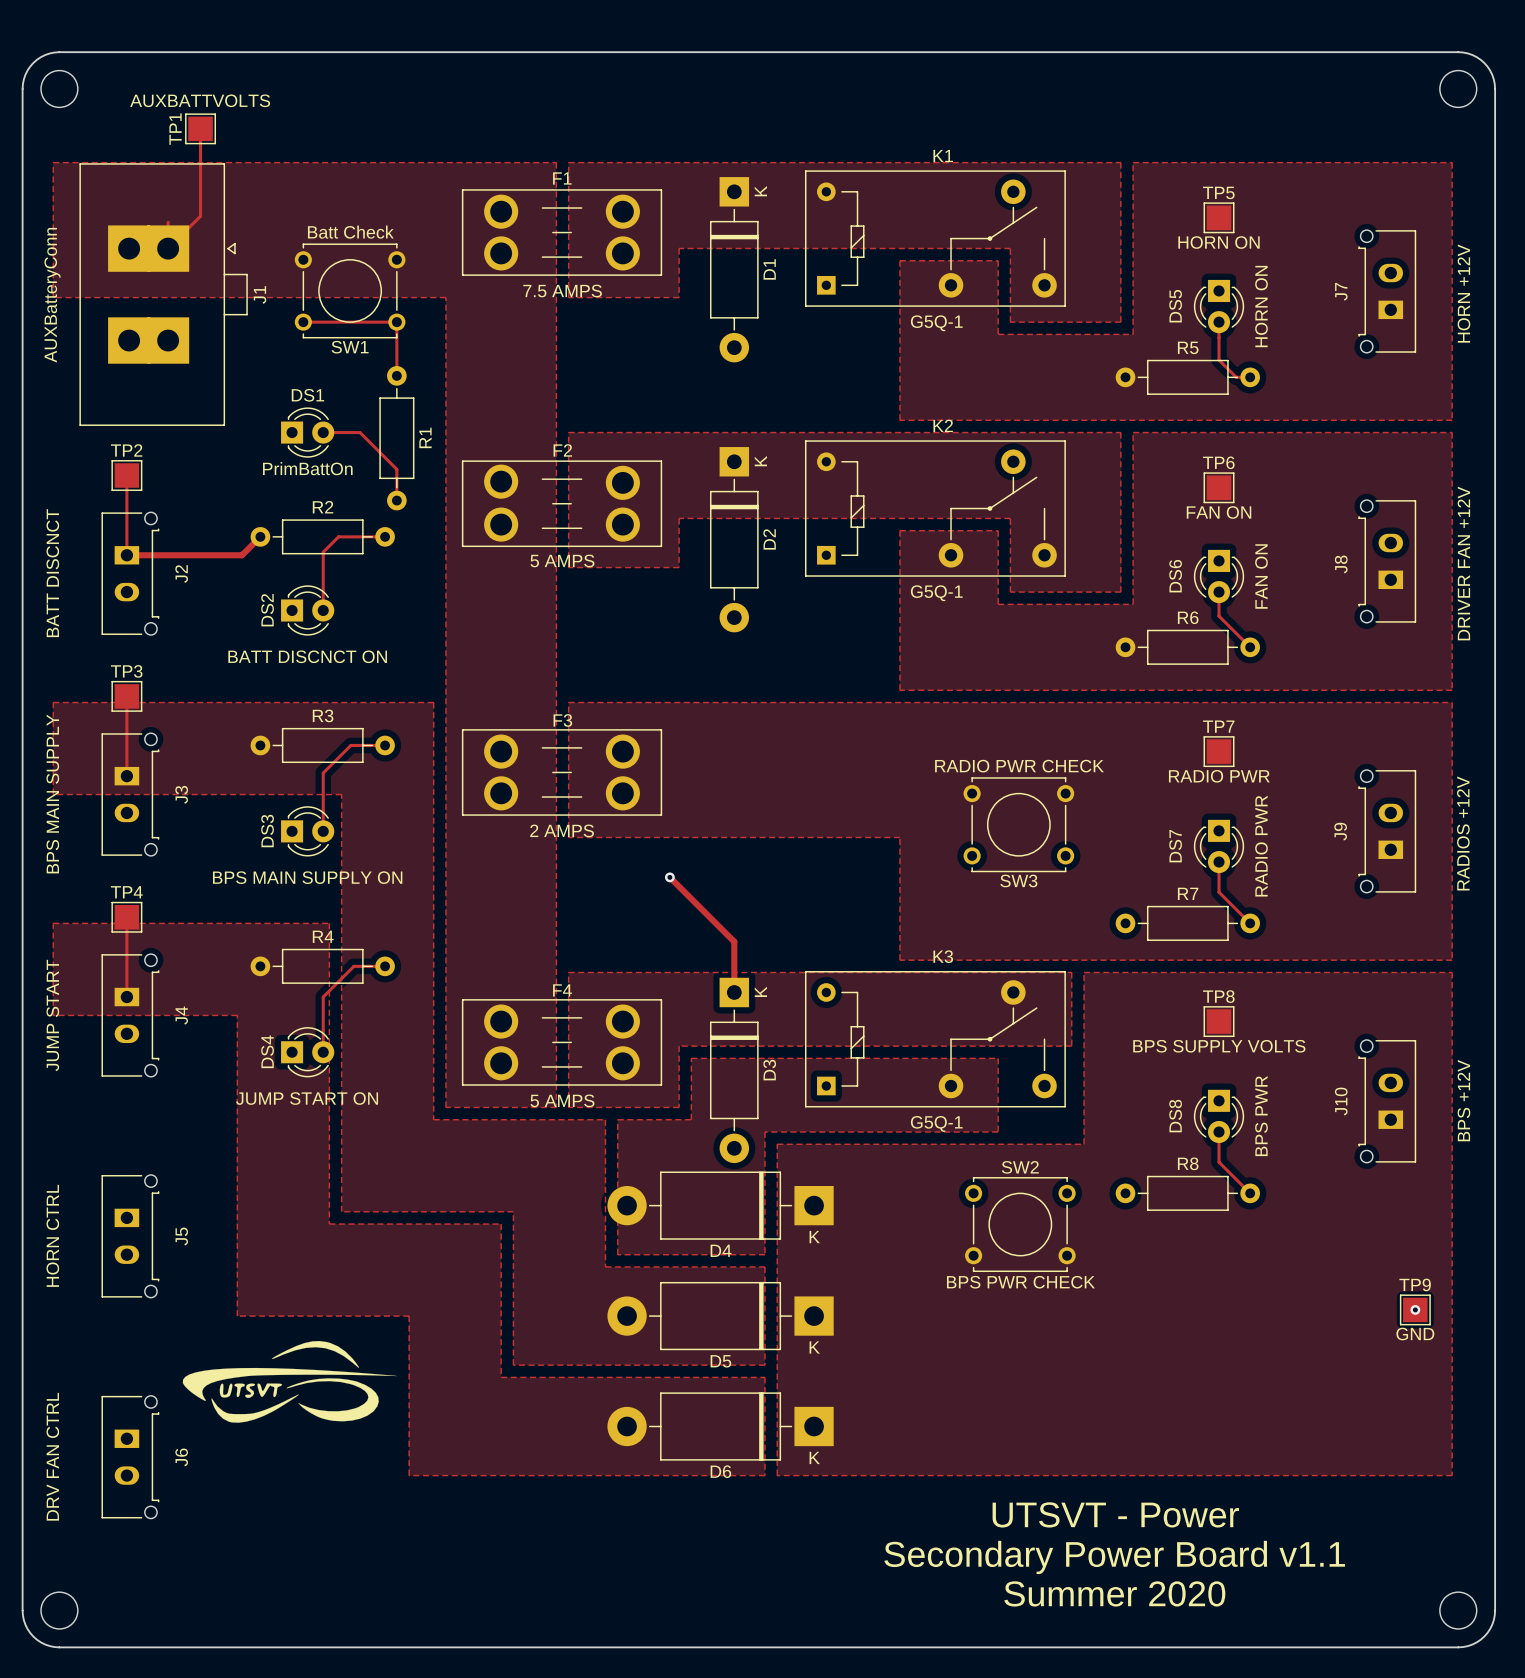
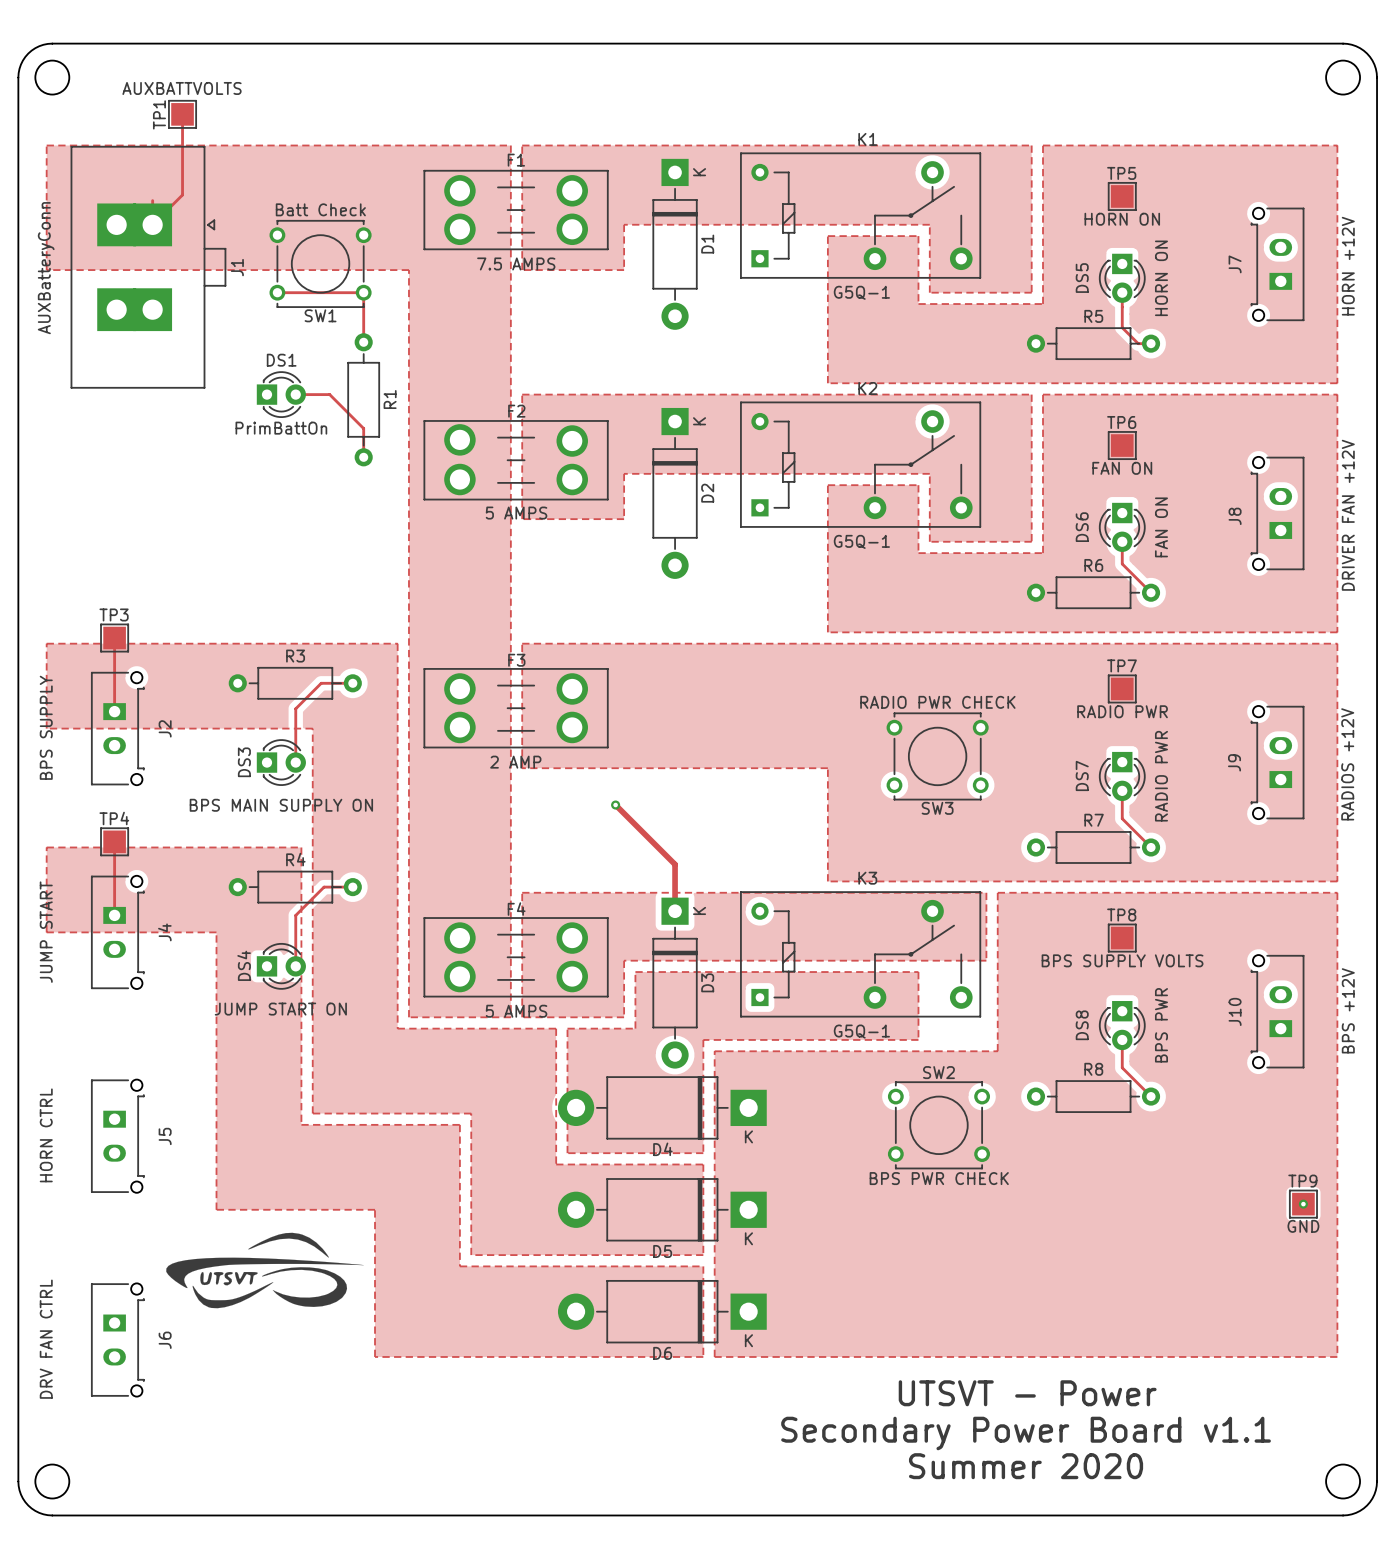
track: (126, 475) (126, 555) (242, 555) (260, 536) -> none
TP2: (126, 475) -> none
R2: (322, 536) -> none
track: (385, 536) (338, 536) (323, 552) (323, 610) -> none
J2: BATT DISCNCT (130, 573) -> none
DS2: BATT DISCNCT ON (307, 610) -> none
J3 value: BPS MAIN SUPPLY (52, 794) -> BPS SUPPLY (46, 727)
J3 name: J3 (181, 794) -> J2 (165, 728)
F3 value: 2 AMPS (562, 830) -> 2 AMP (515, 762)

